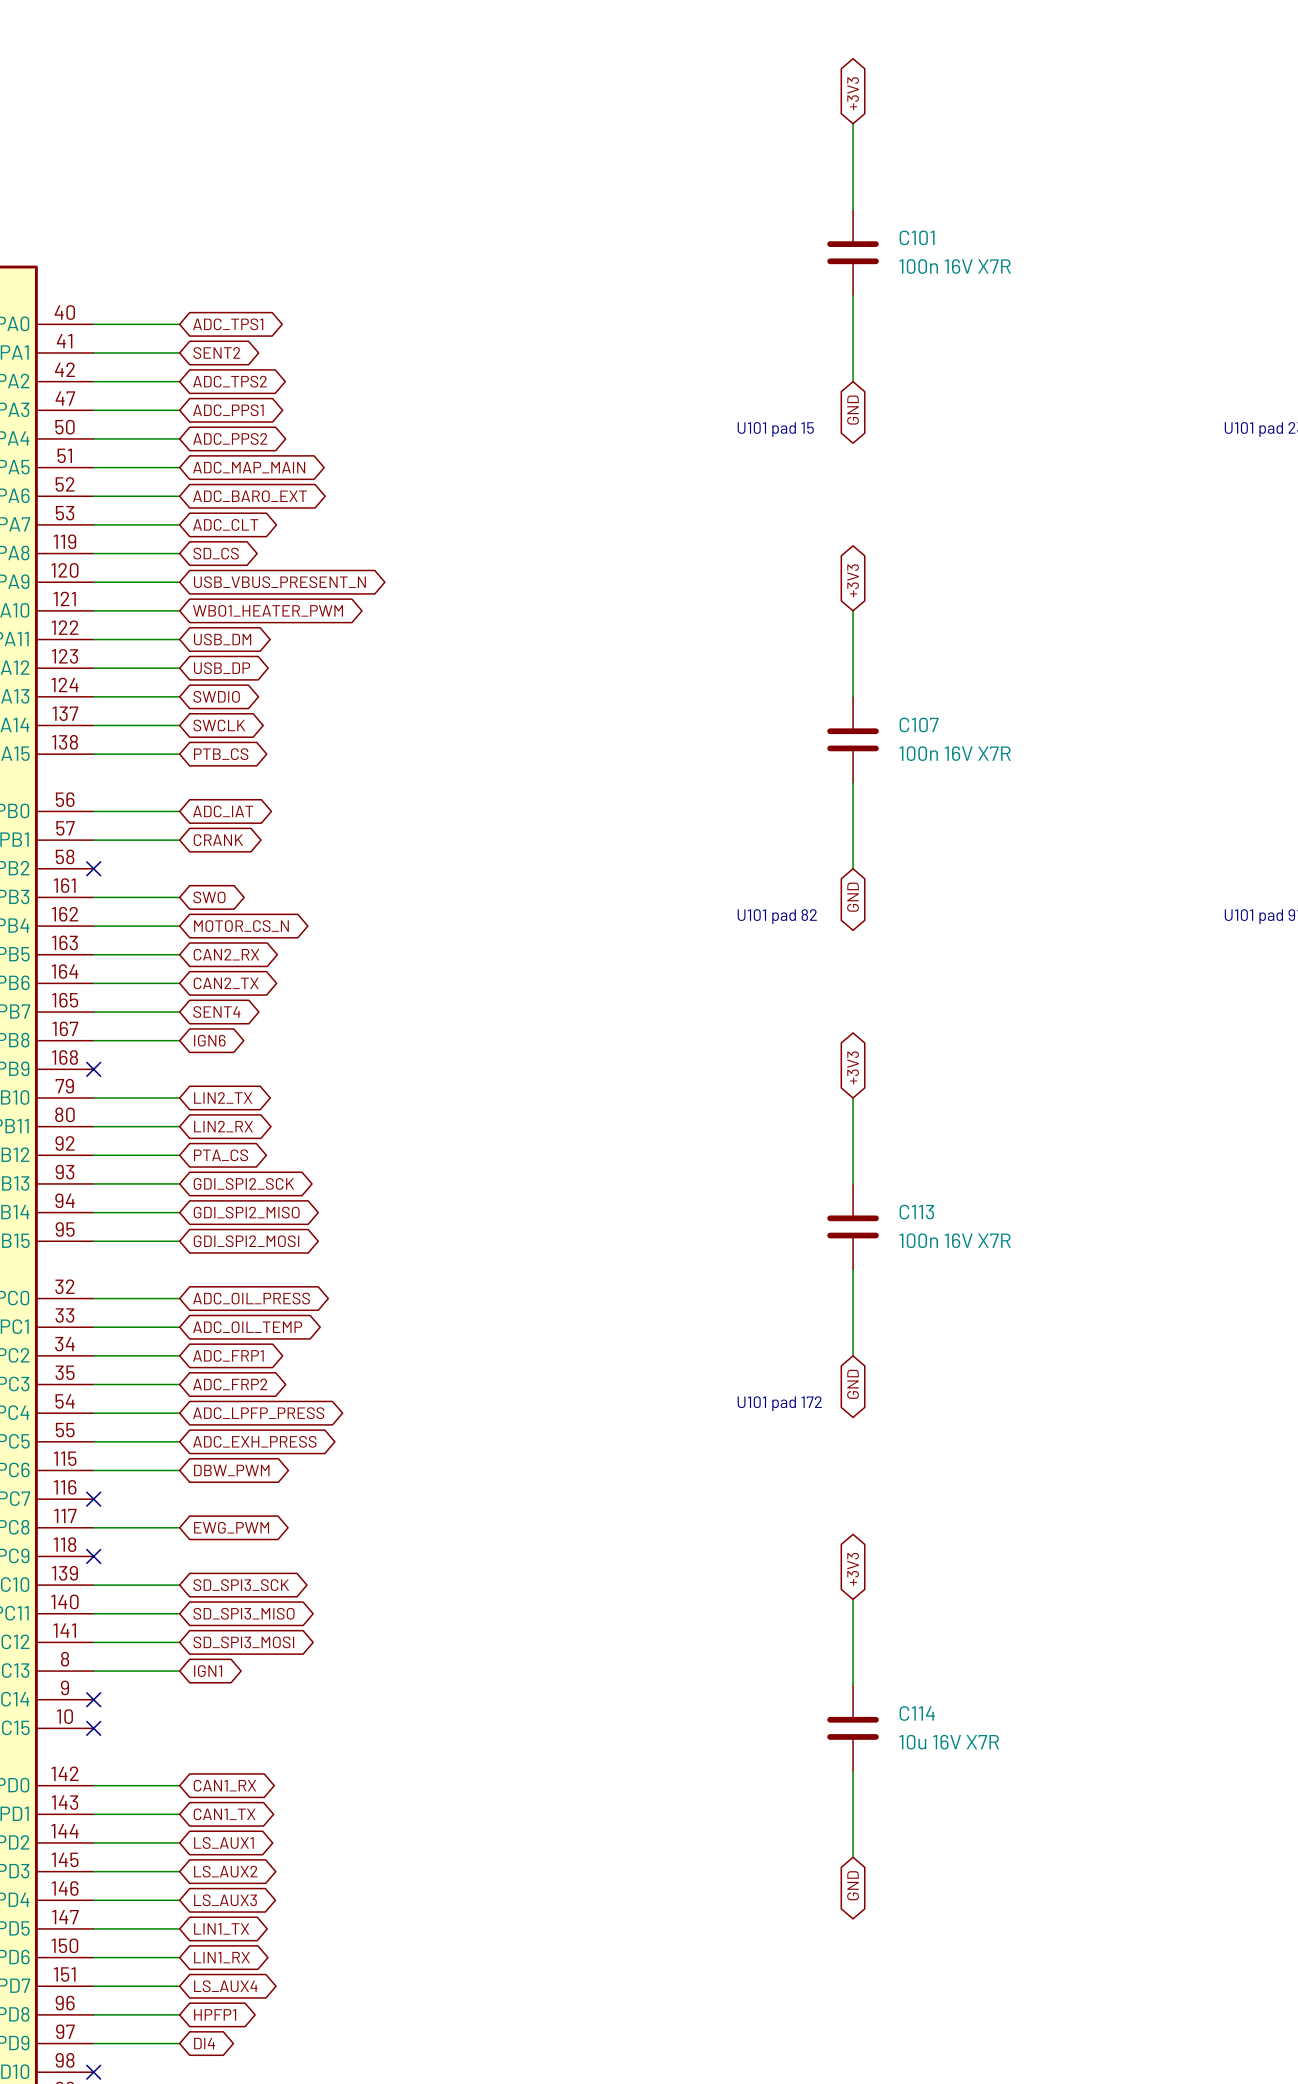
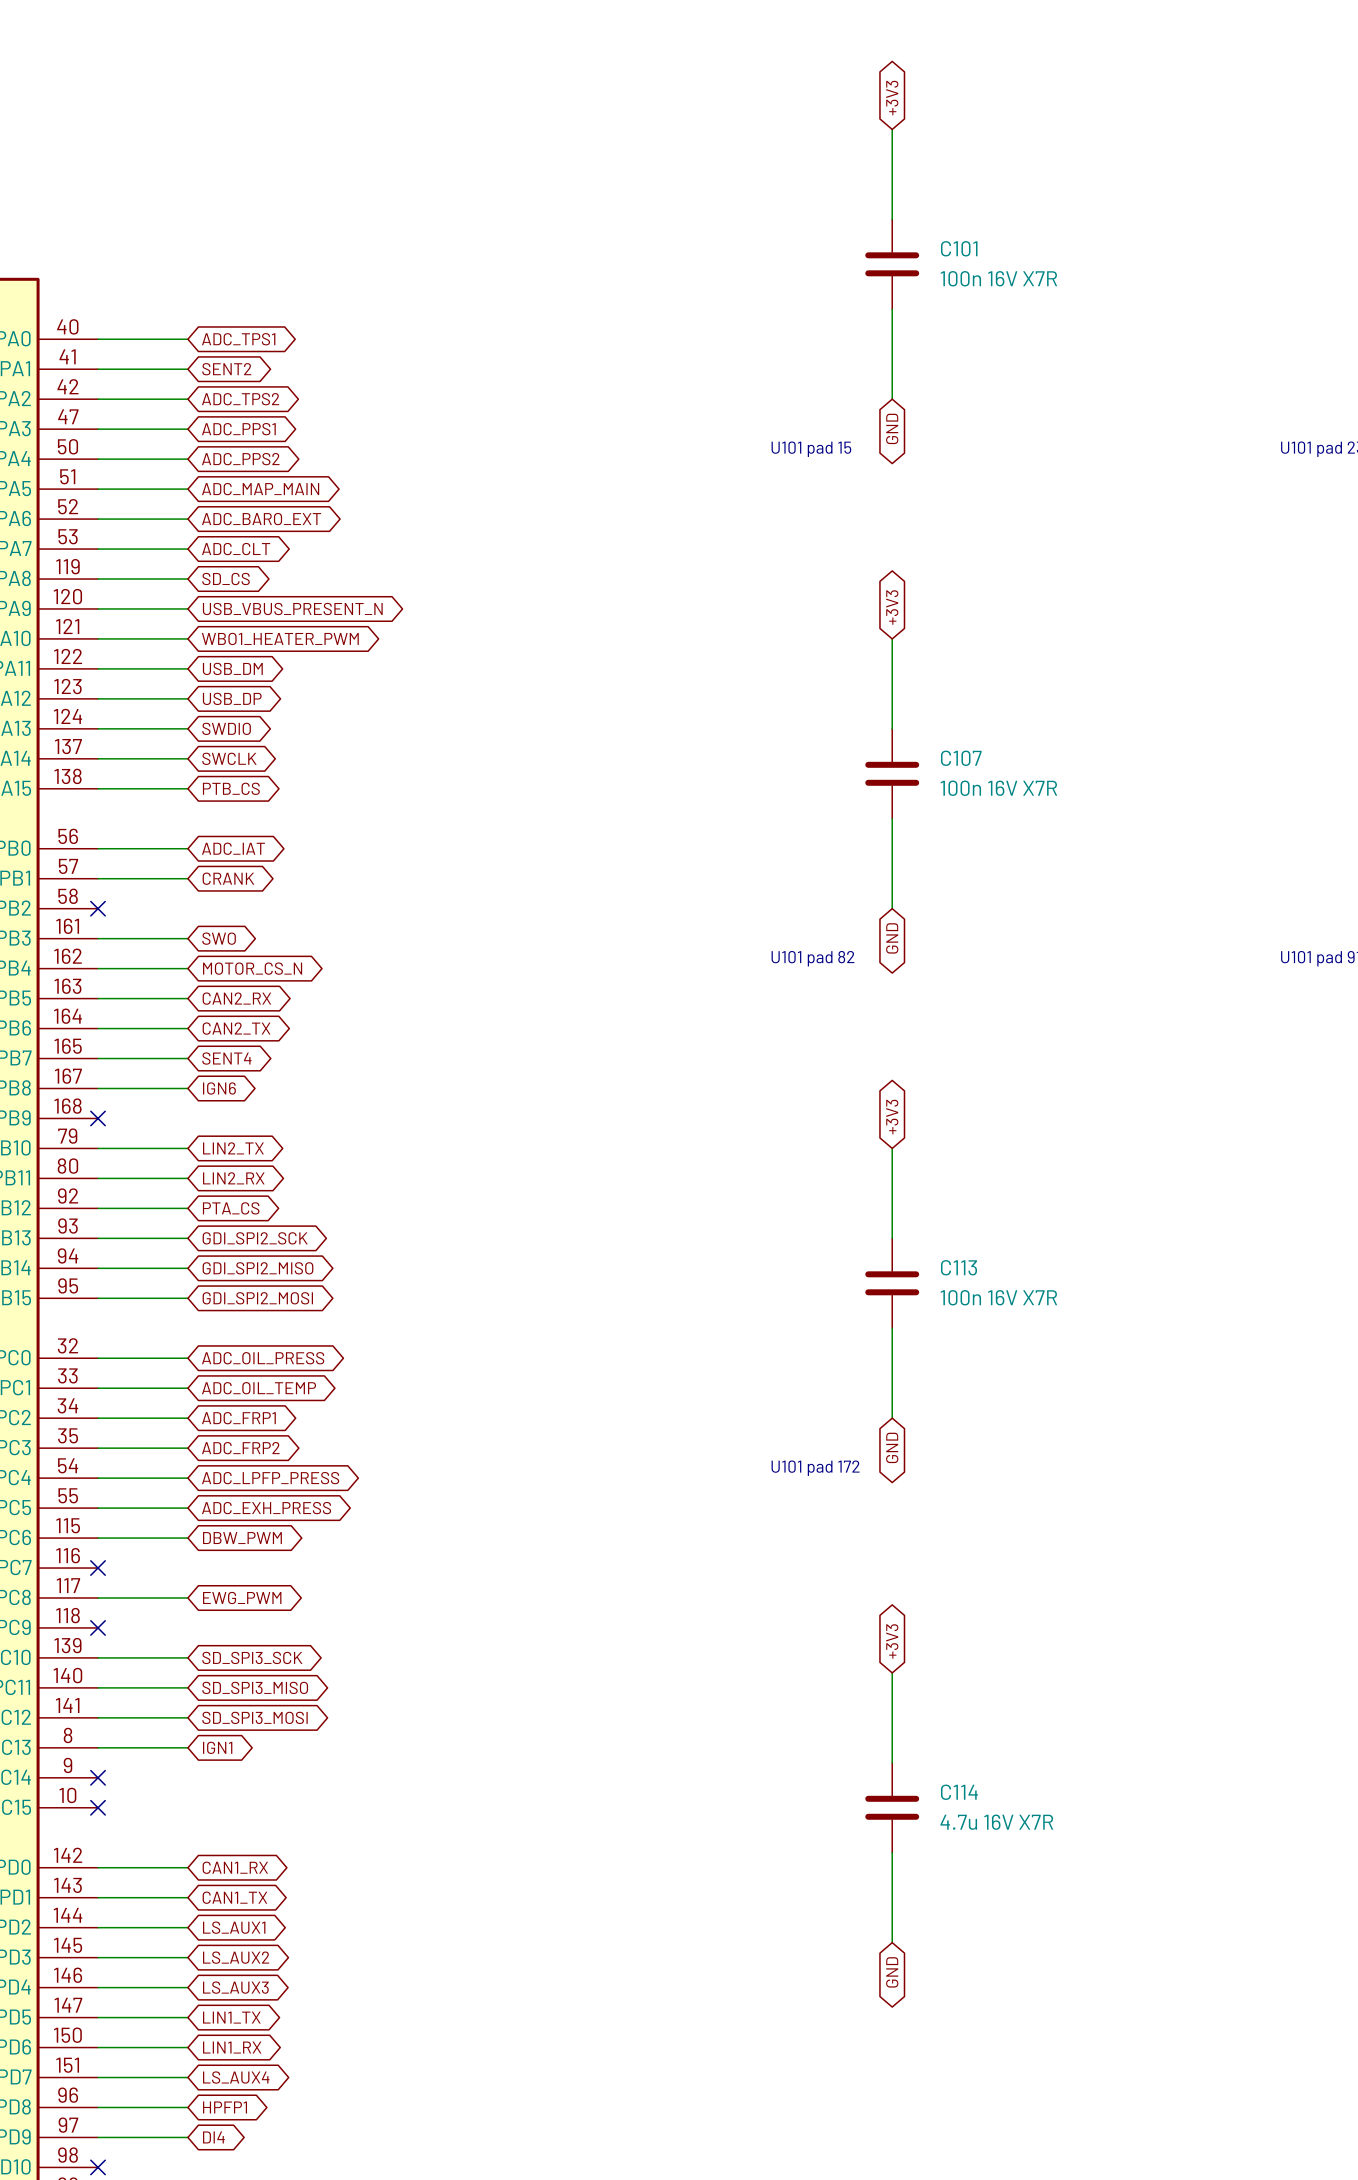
C114 value: 10u 16V X7R (949, 1742) -> 4.7u 16V X7R (996, 1822)

